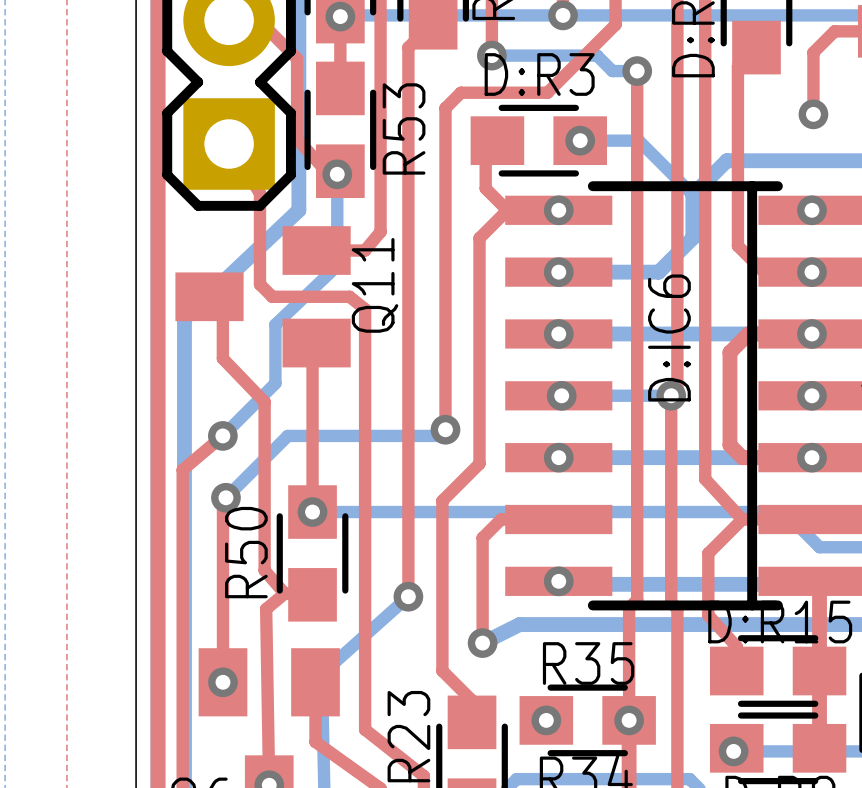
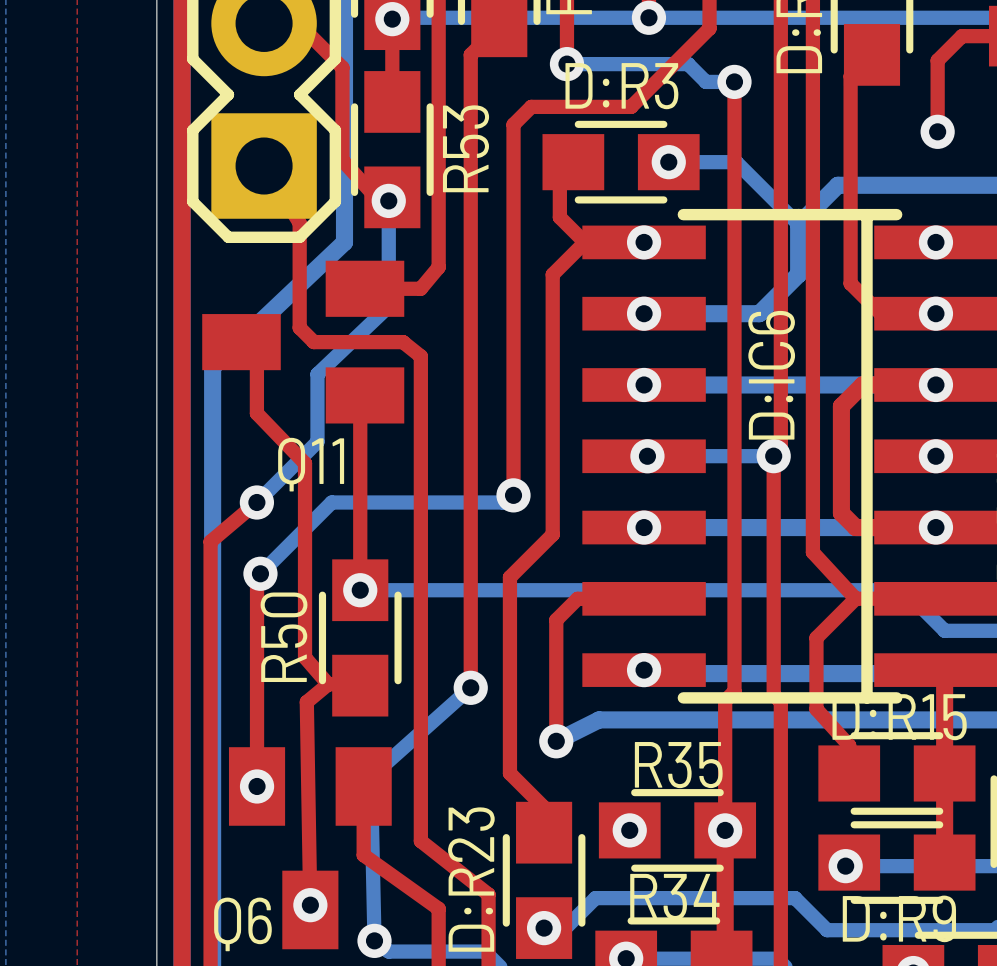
Q11 name rotation: 0° (375, 285) -> 90° clockwise (311, 464)
Q11 name position: Q11 (375, 285) -> Q11 (311, 464)

